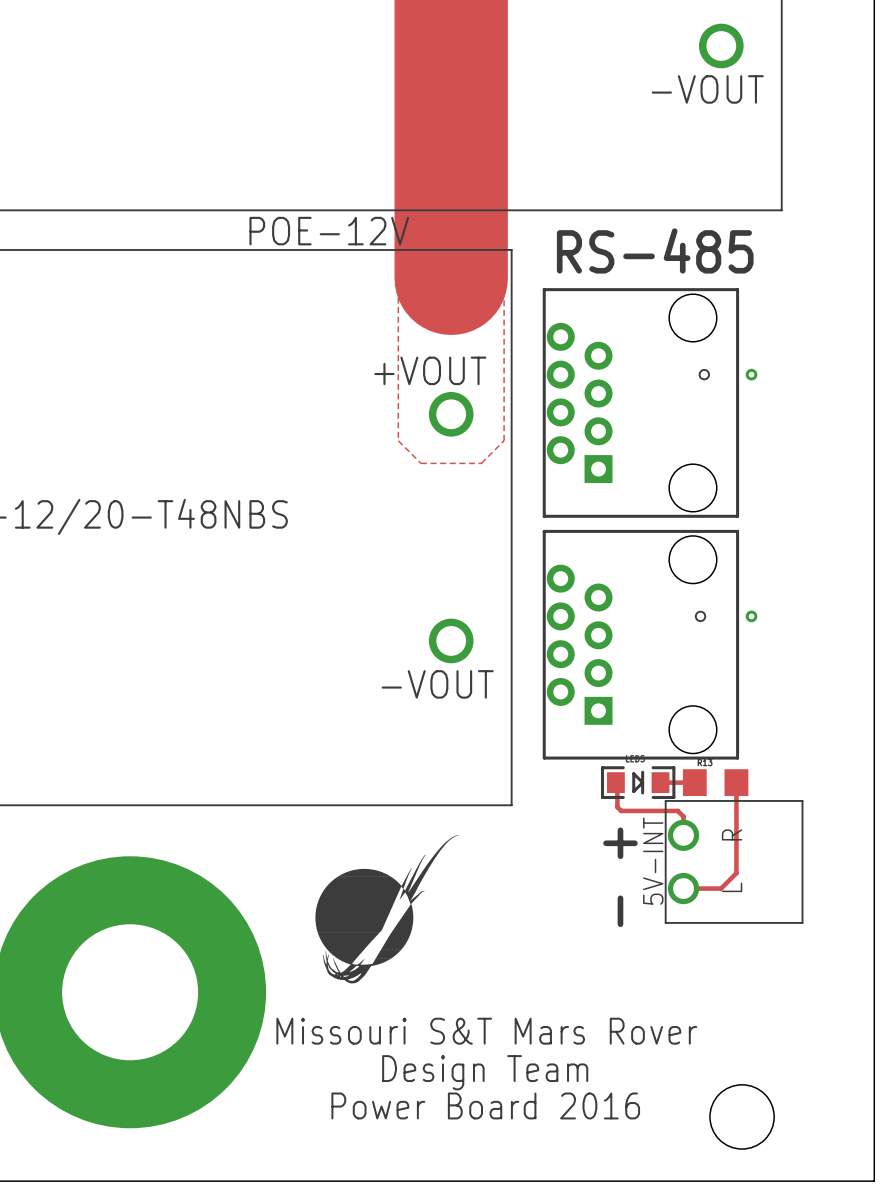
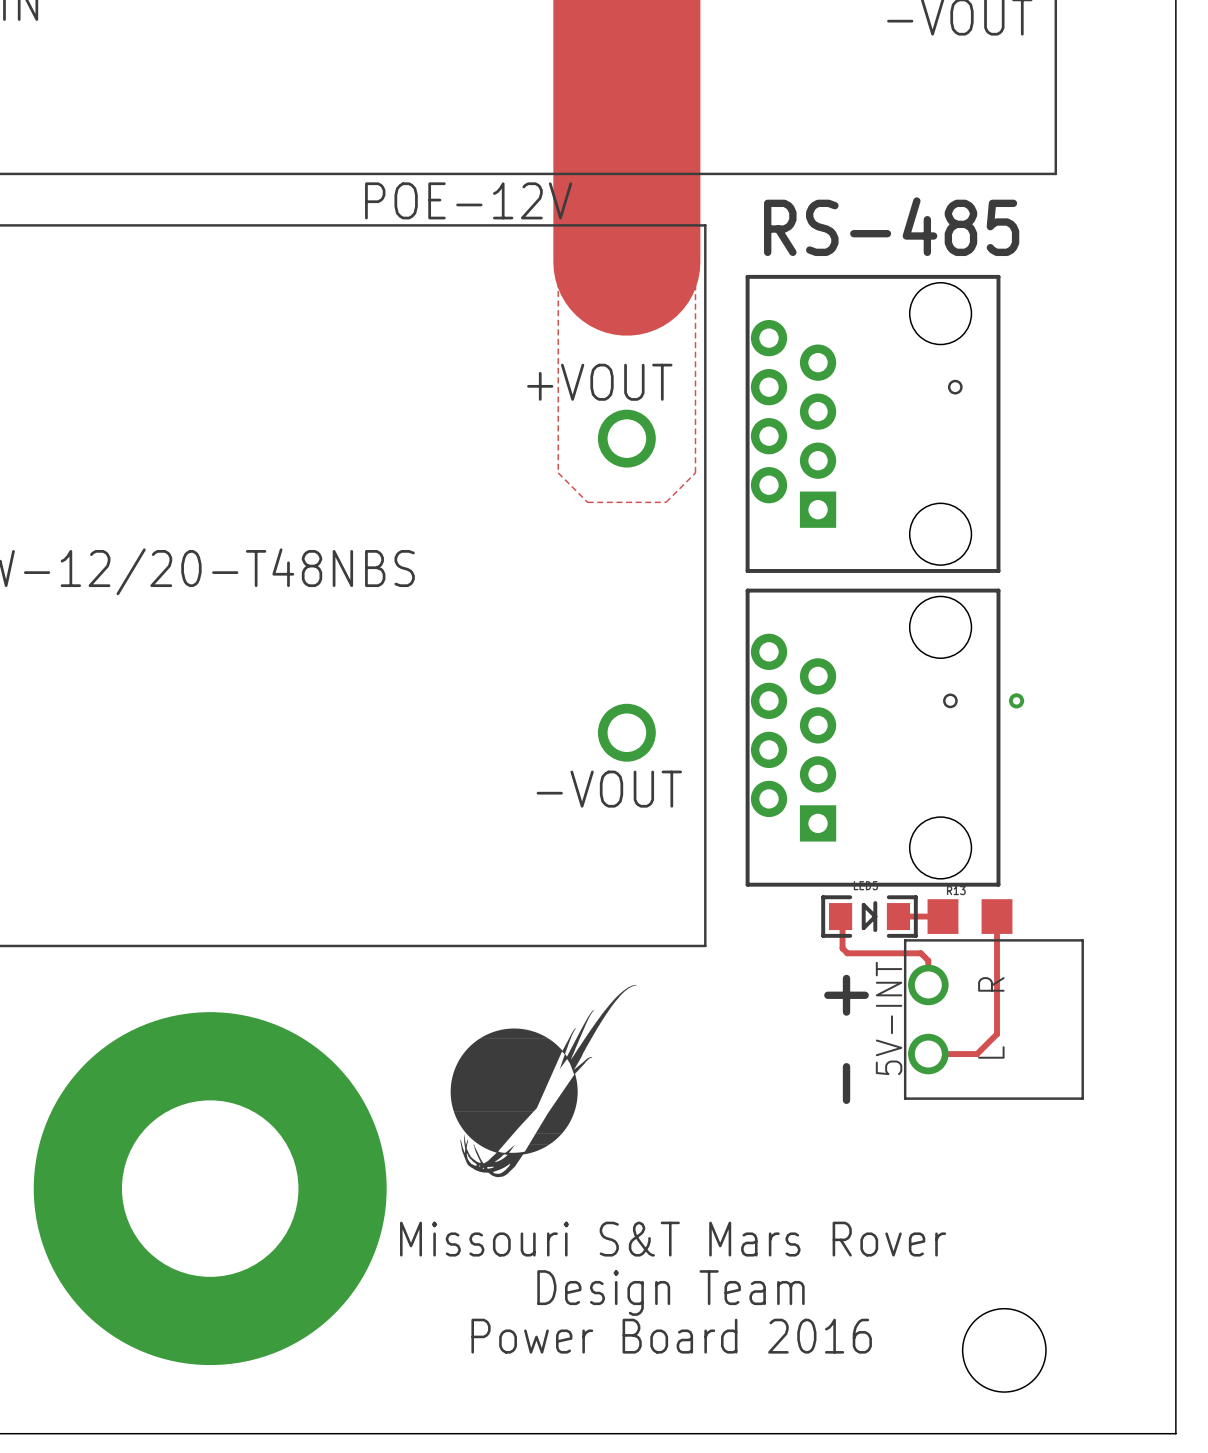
via: (751, 374) -> none

